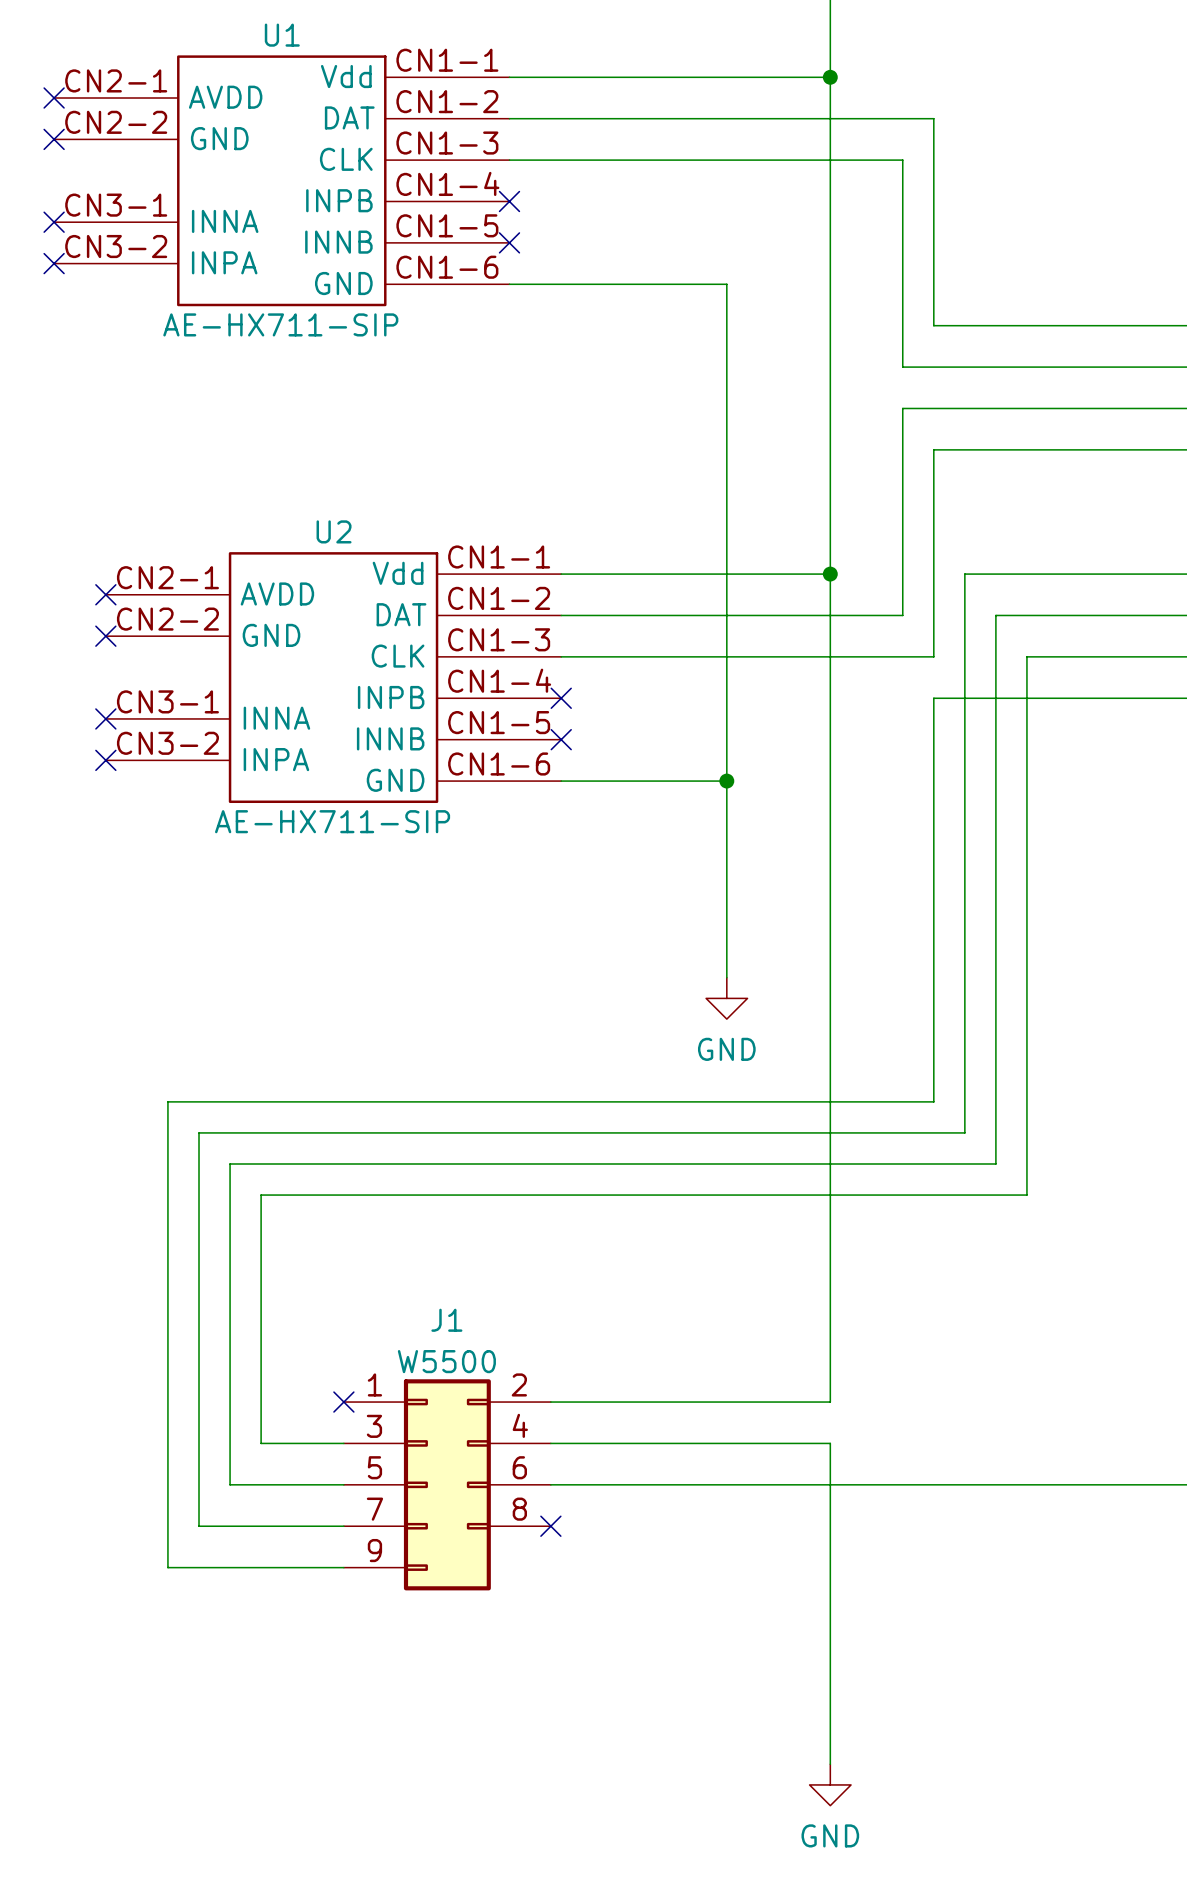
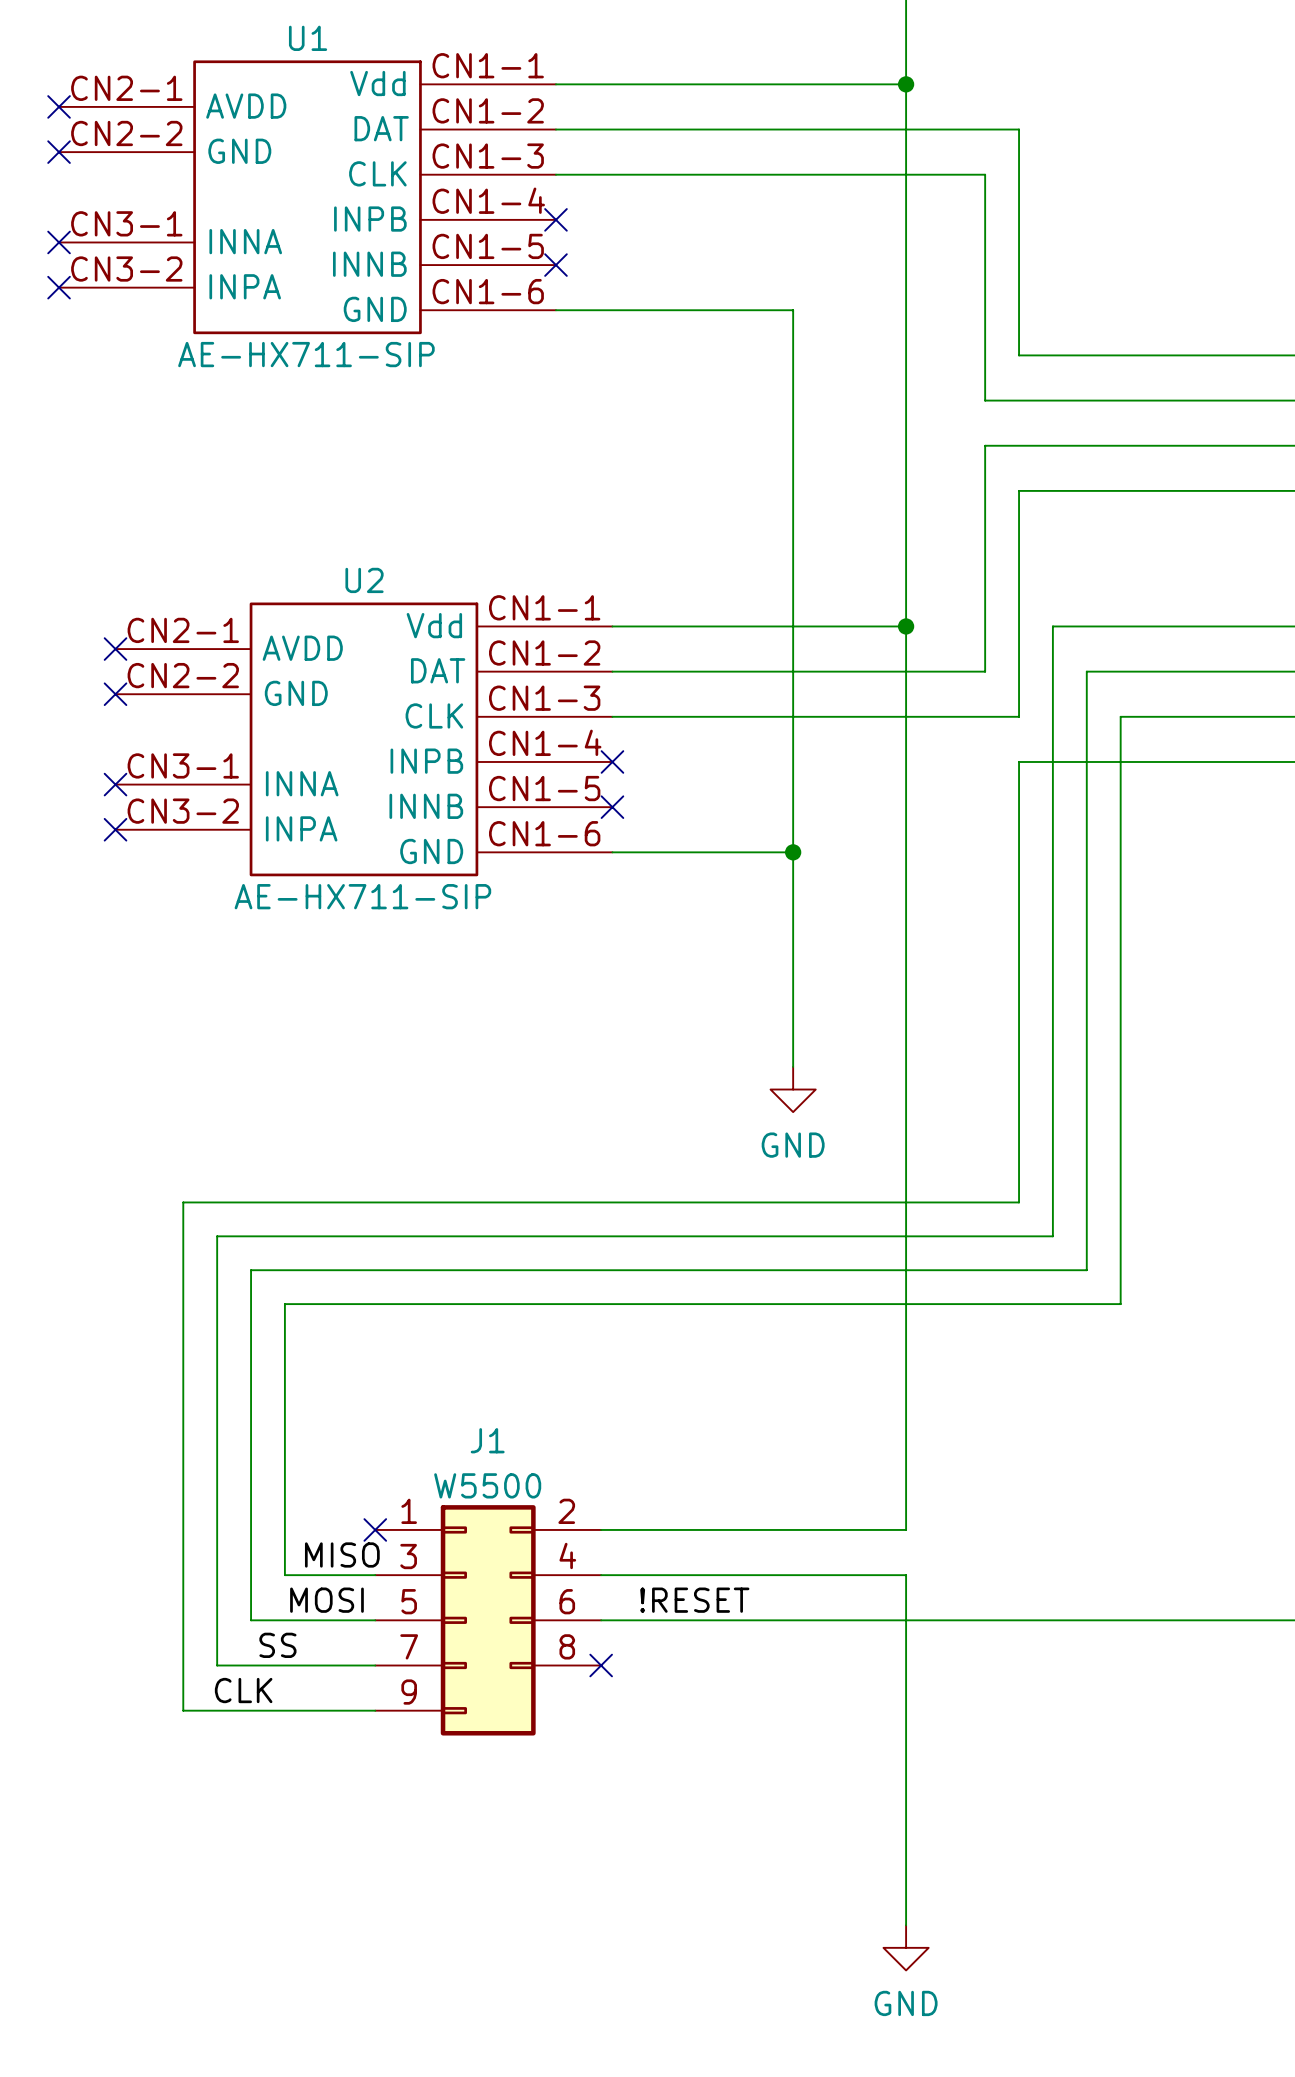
label: none -> MISO (342, 1554)
label: none -> MOSI (326, 1600)
label: none -> !RESET (694, 1600)
label: none -> SS (277, 1645)
label: none -> CLK (243, 1690)

